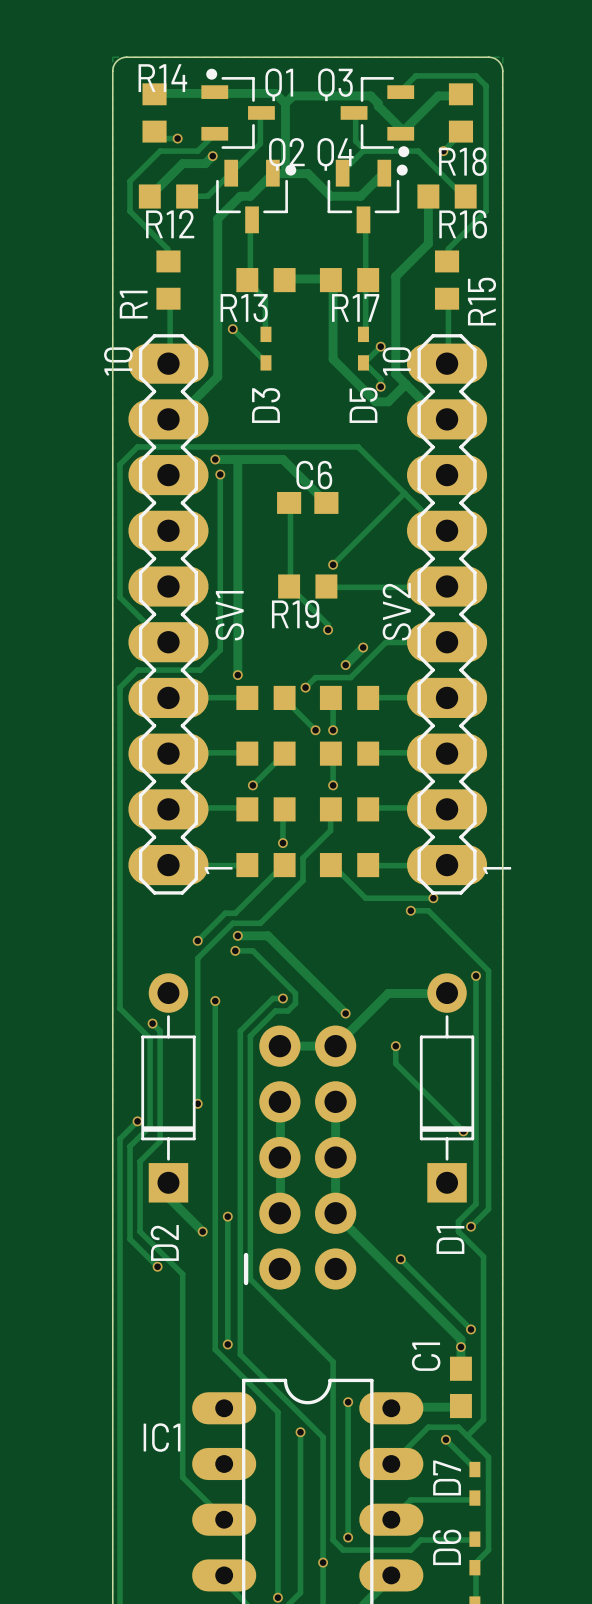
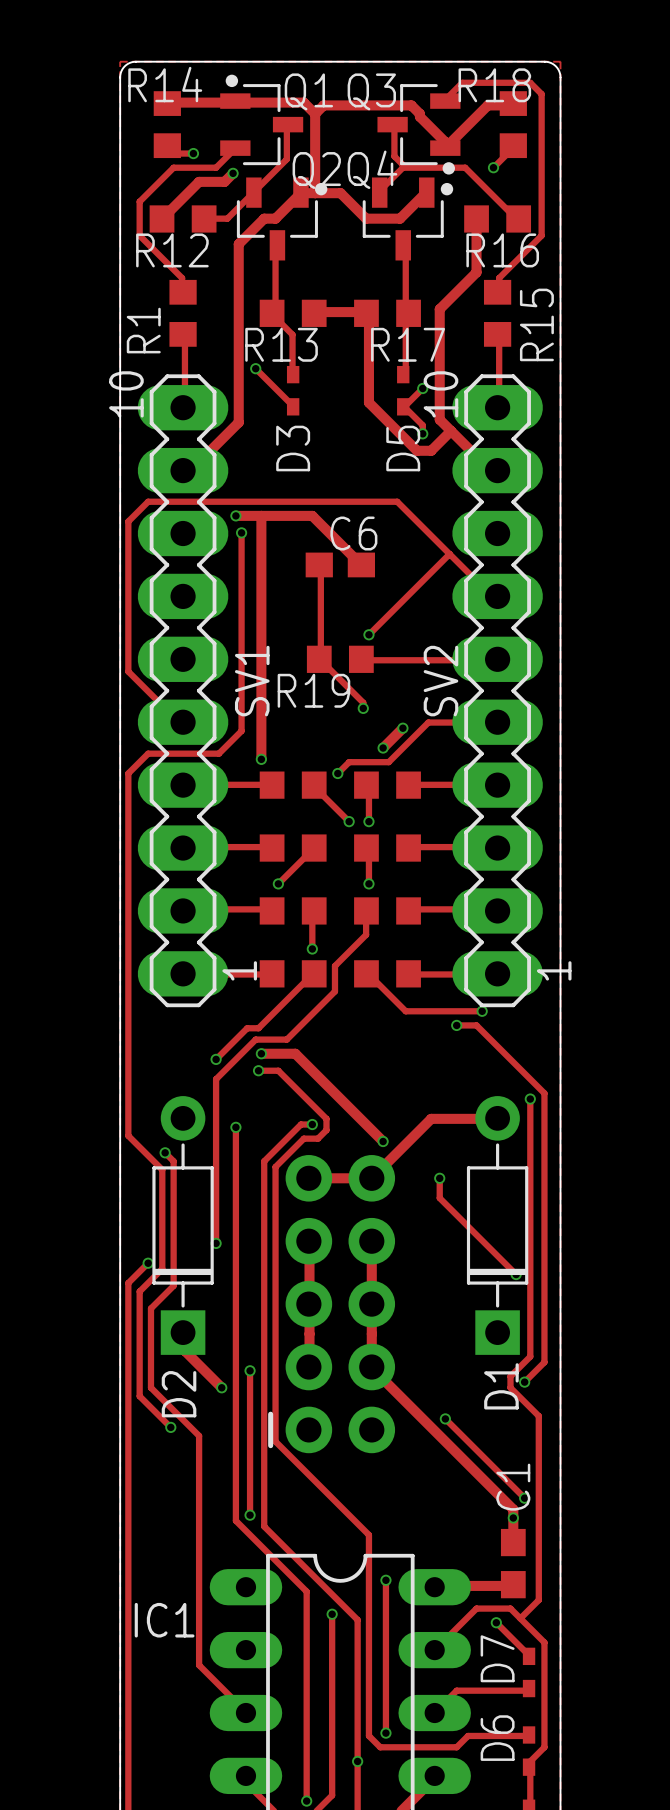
R18 name position: R18 (462, 161) -> R18 (494, 85)
C1 name position: C1 (426, 1356) -> C1 (513, 1487)

